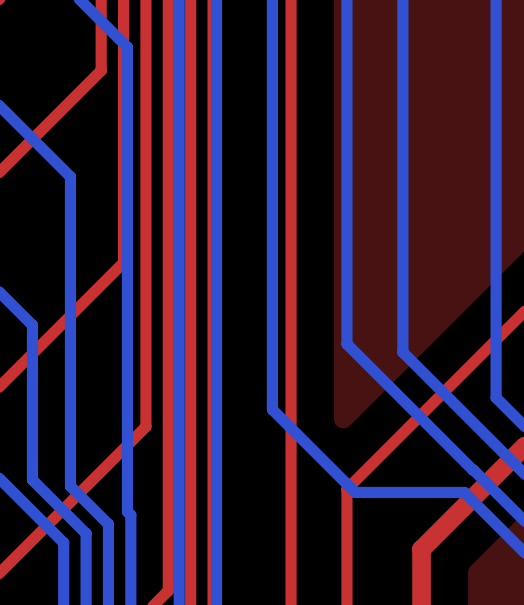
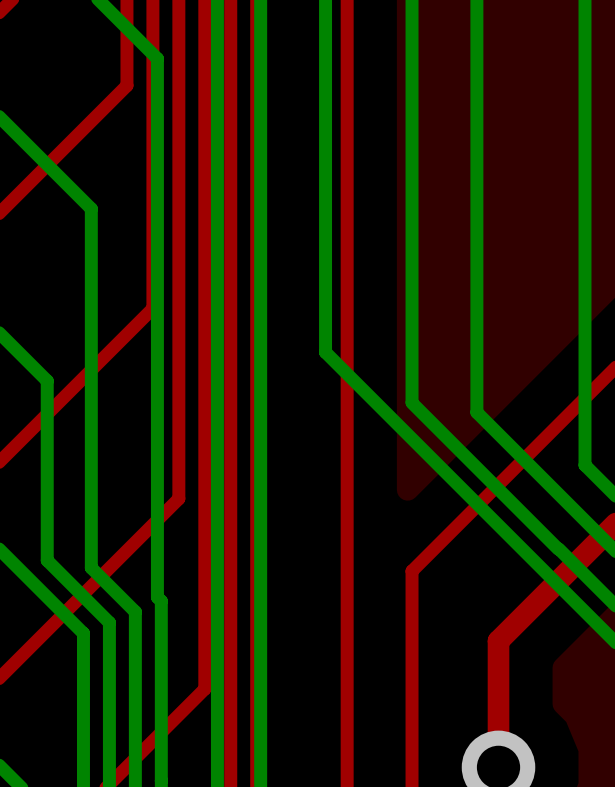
bottom track: (272, 300) (272, 409) (355, 492) (464, 492) -> (325, 352) (548, 575)

